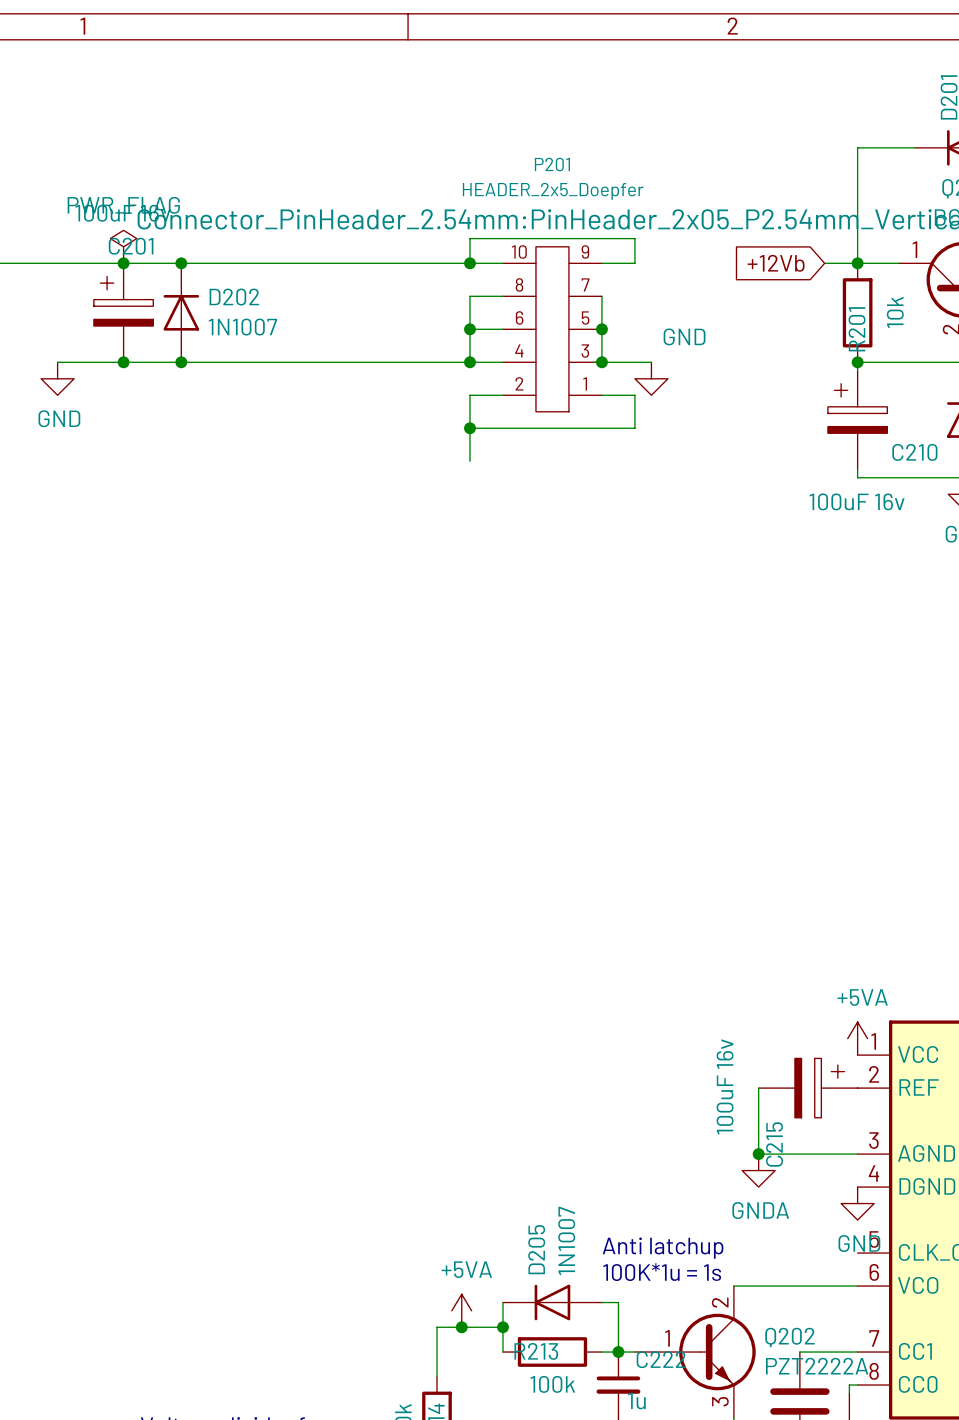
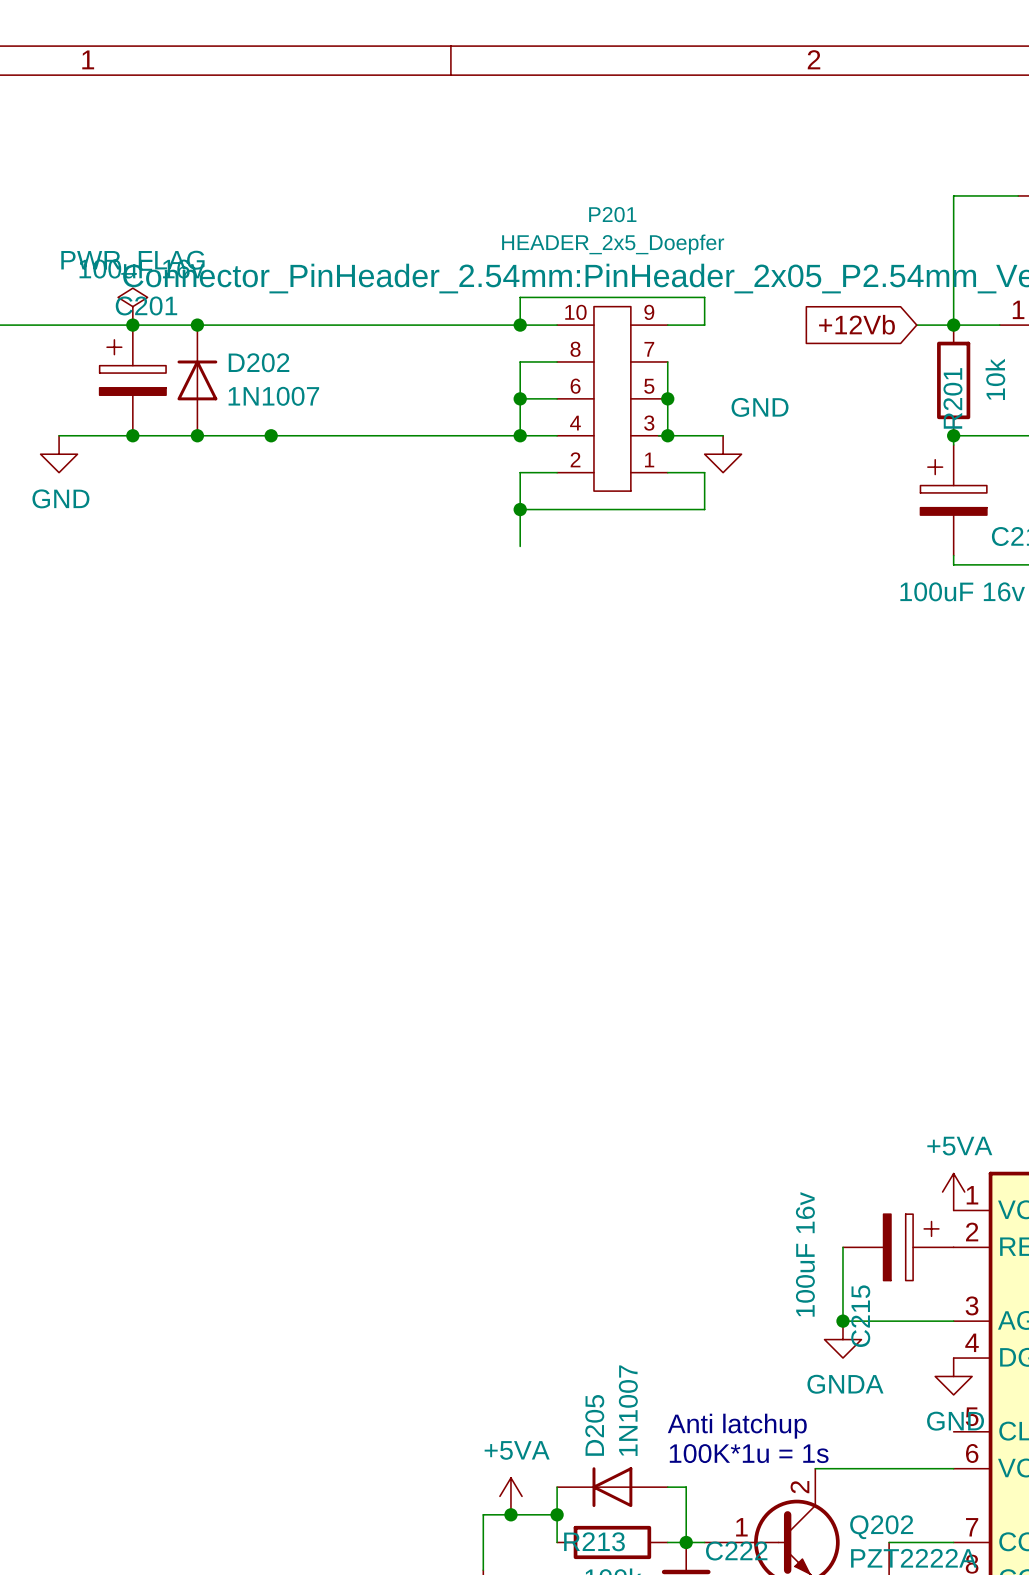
junction: none -> (271, 435)

